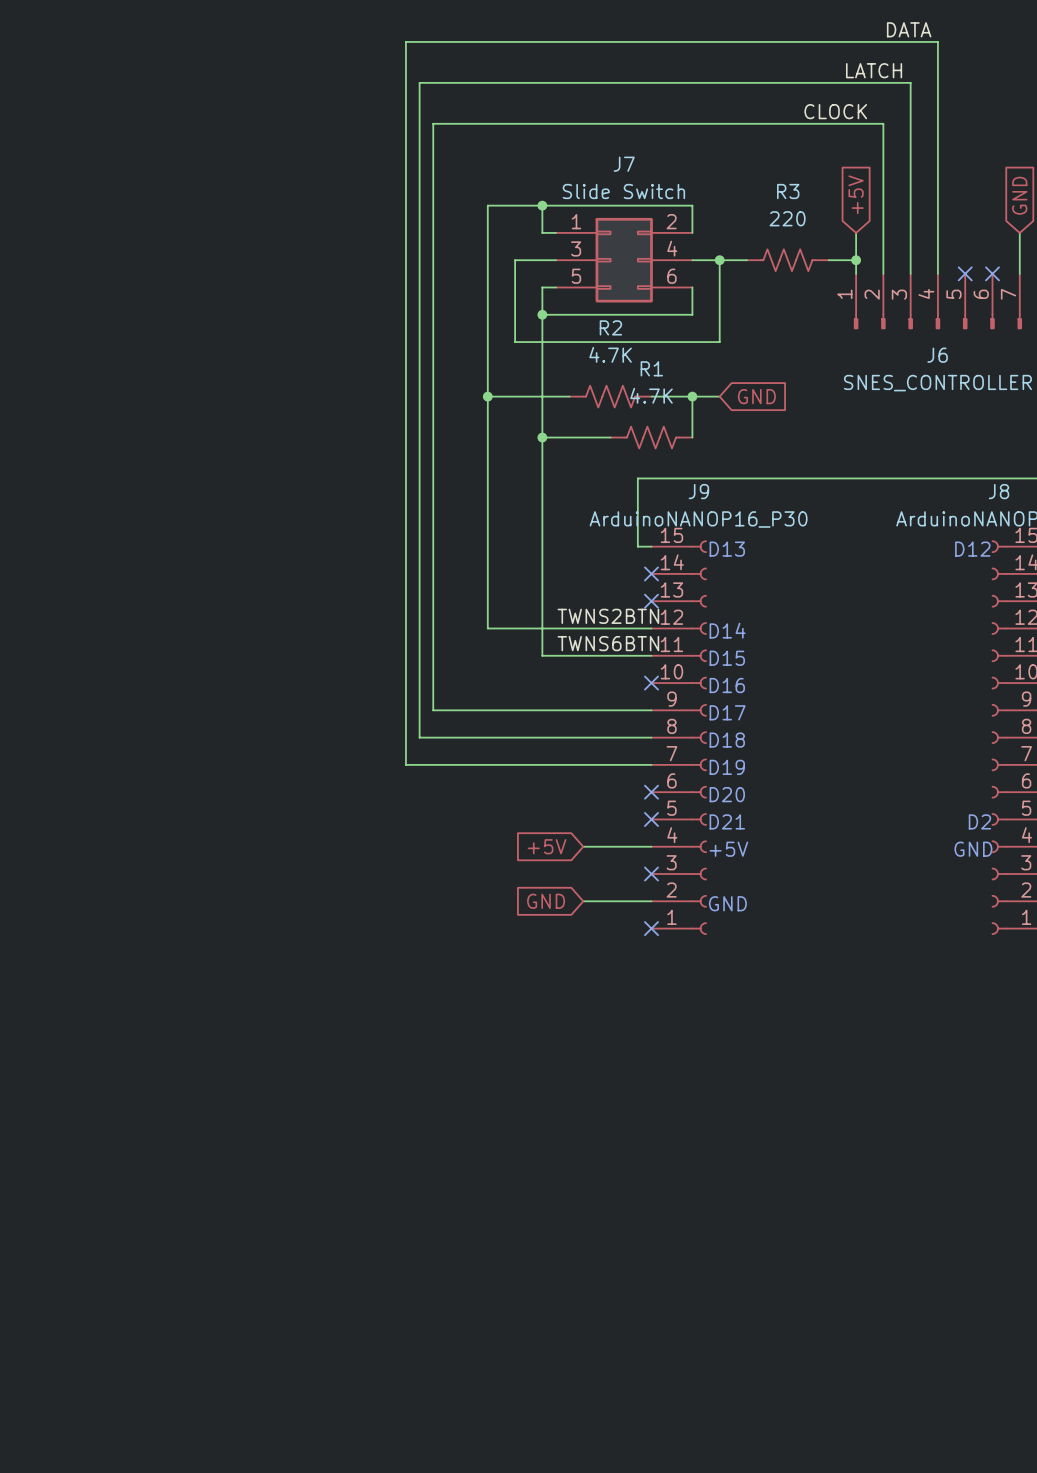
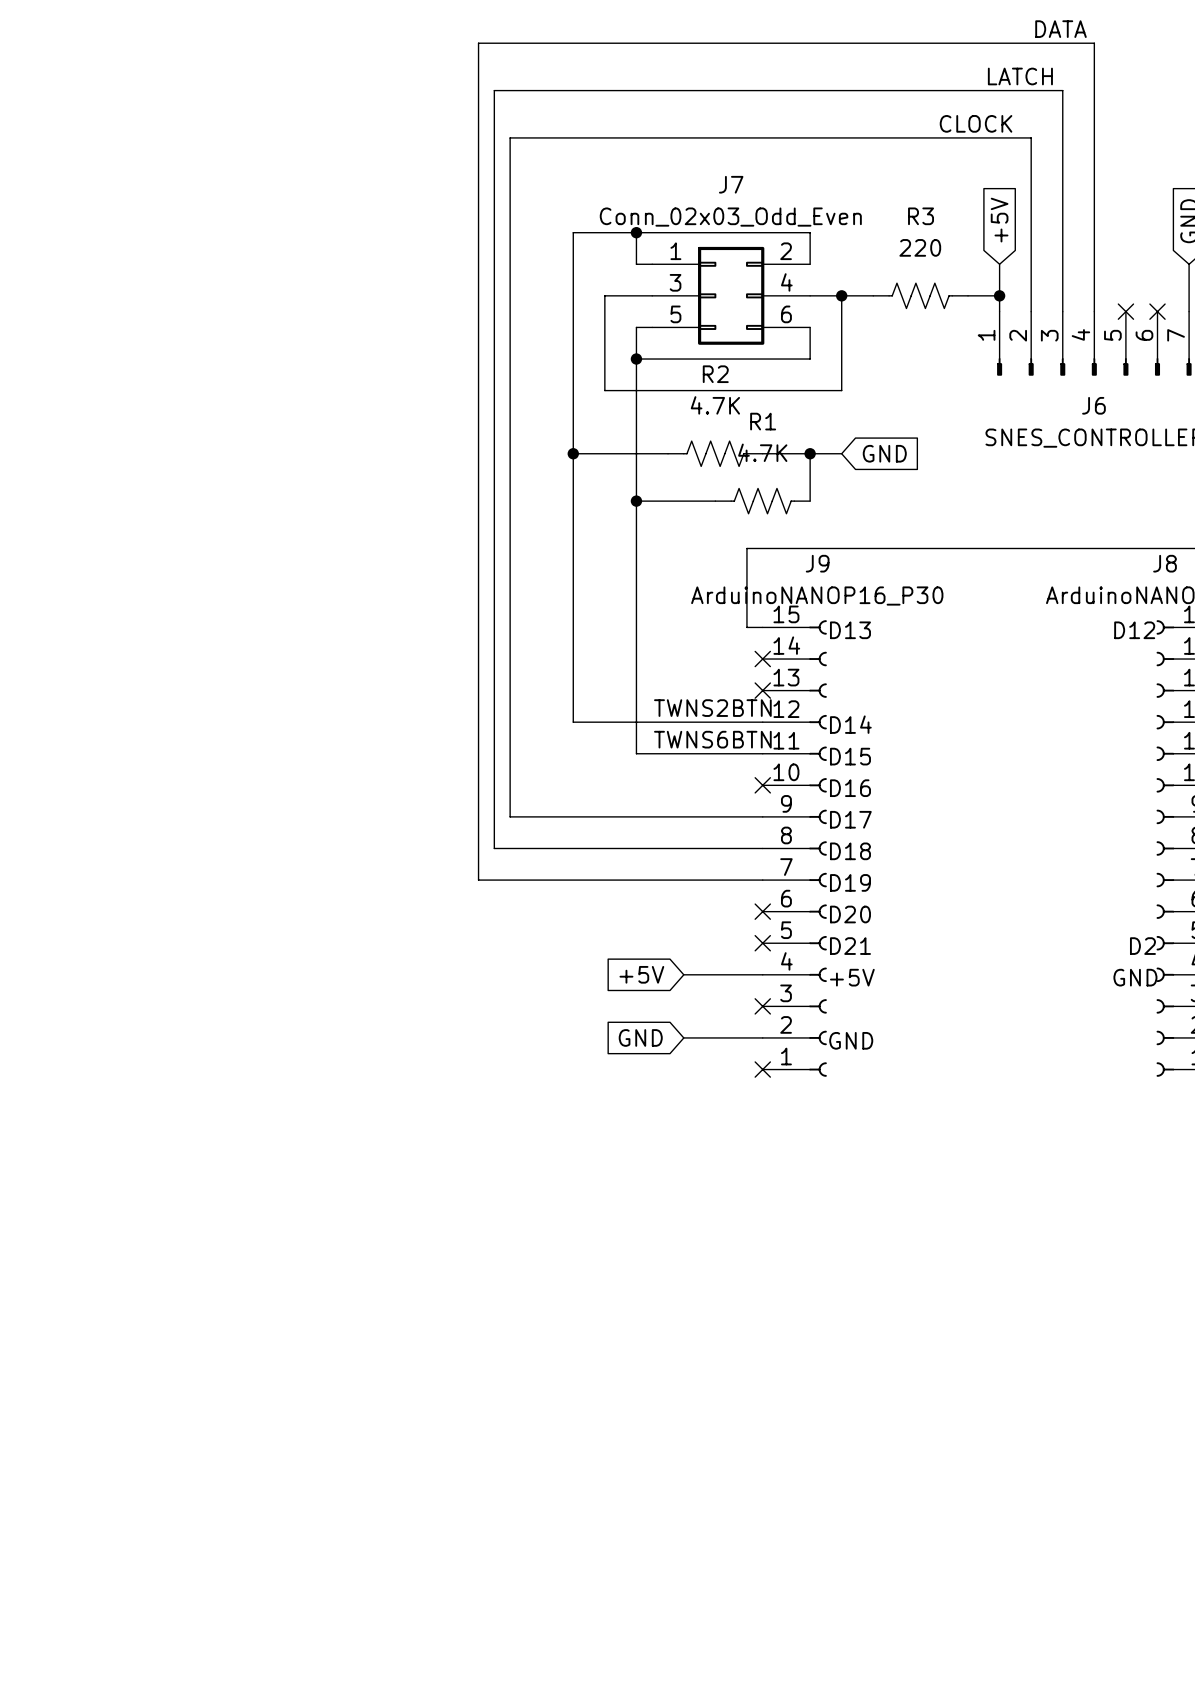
J7 value: Slide Switch (623, 191) -> Conn_02x03_Odd_Even (730, 217)

